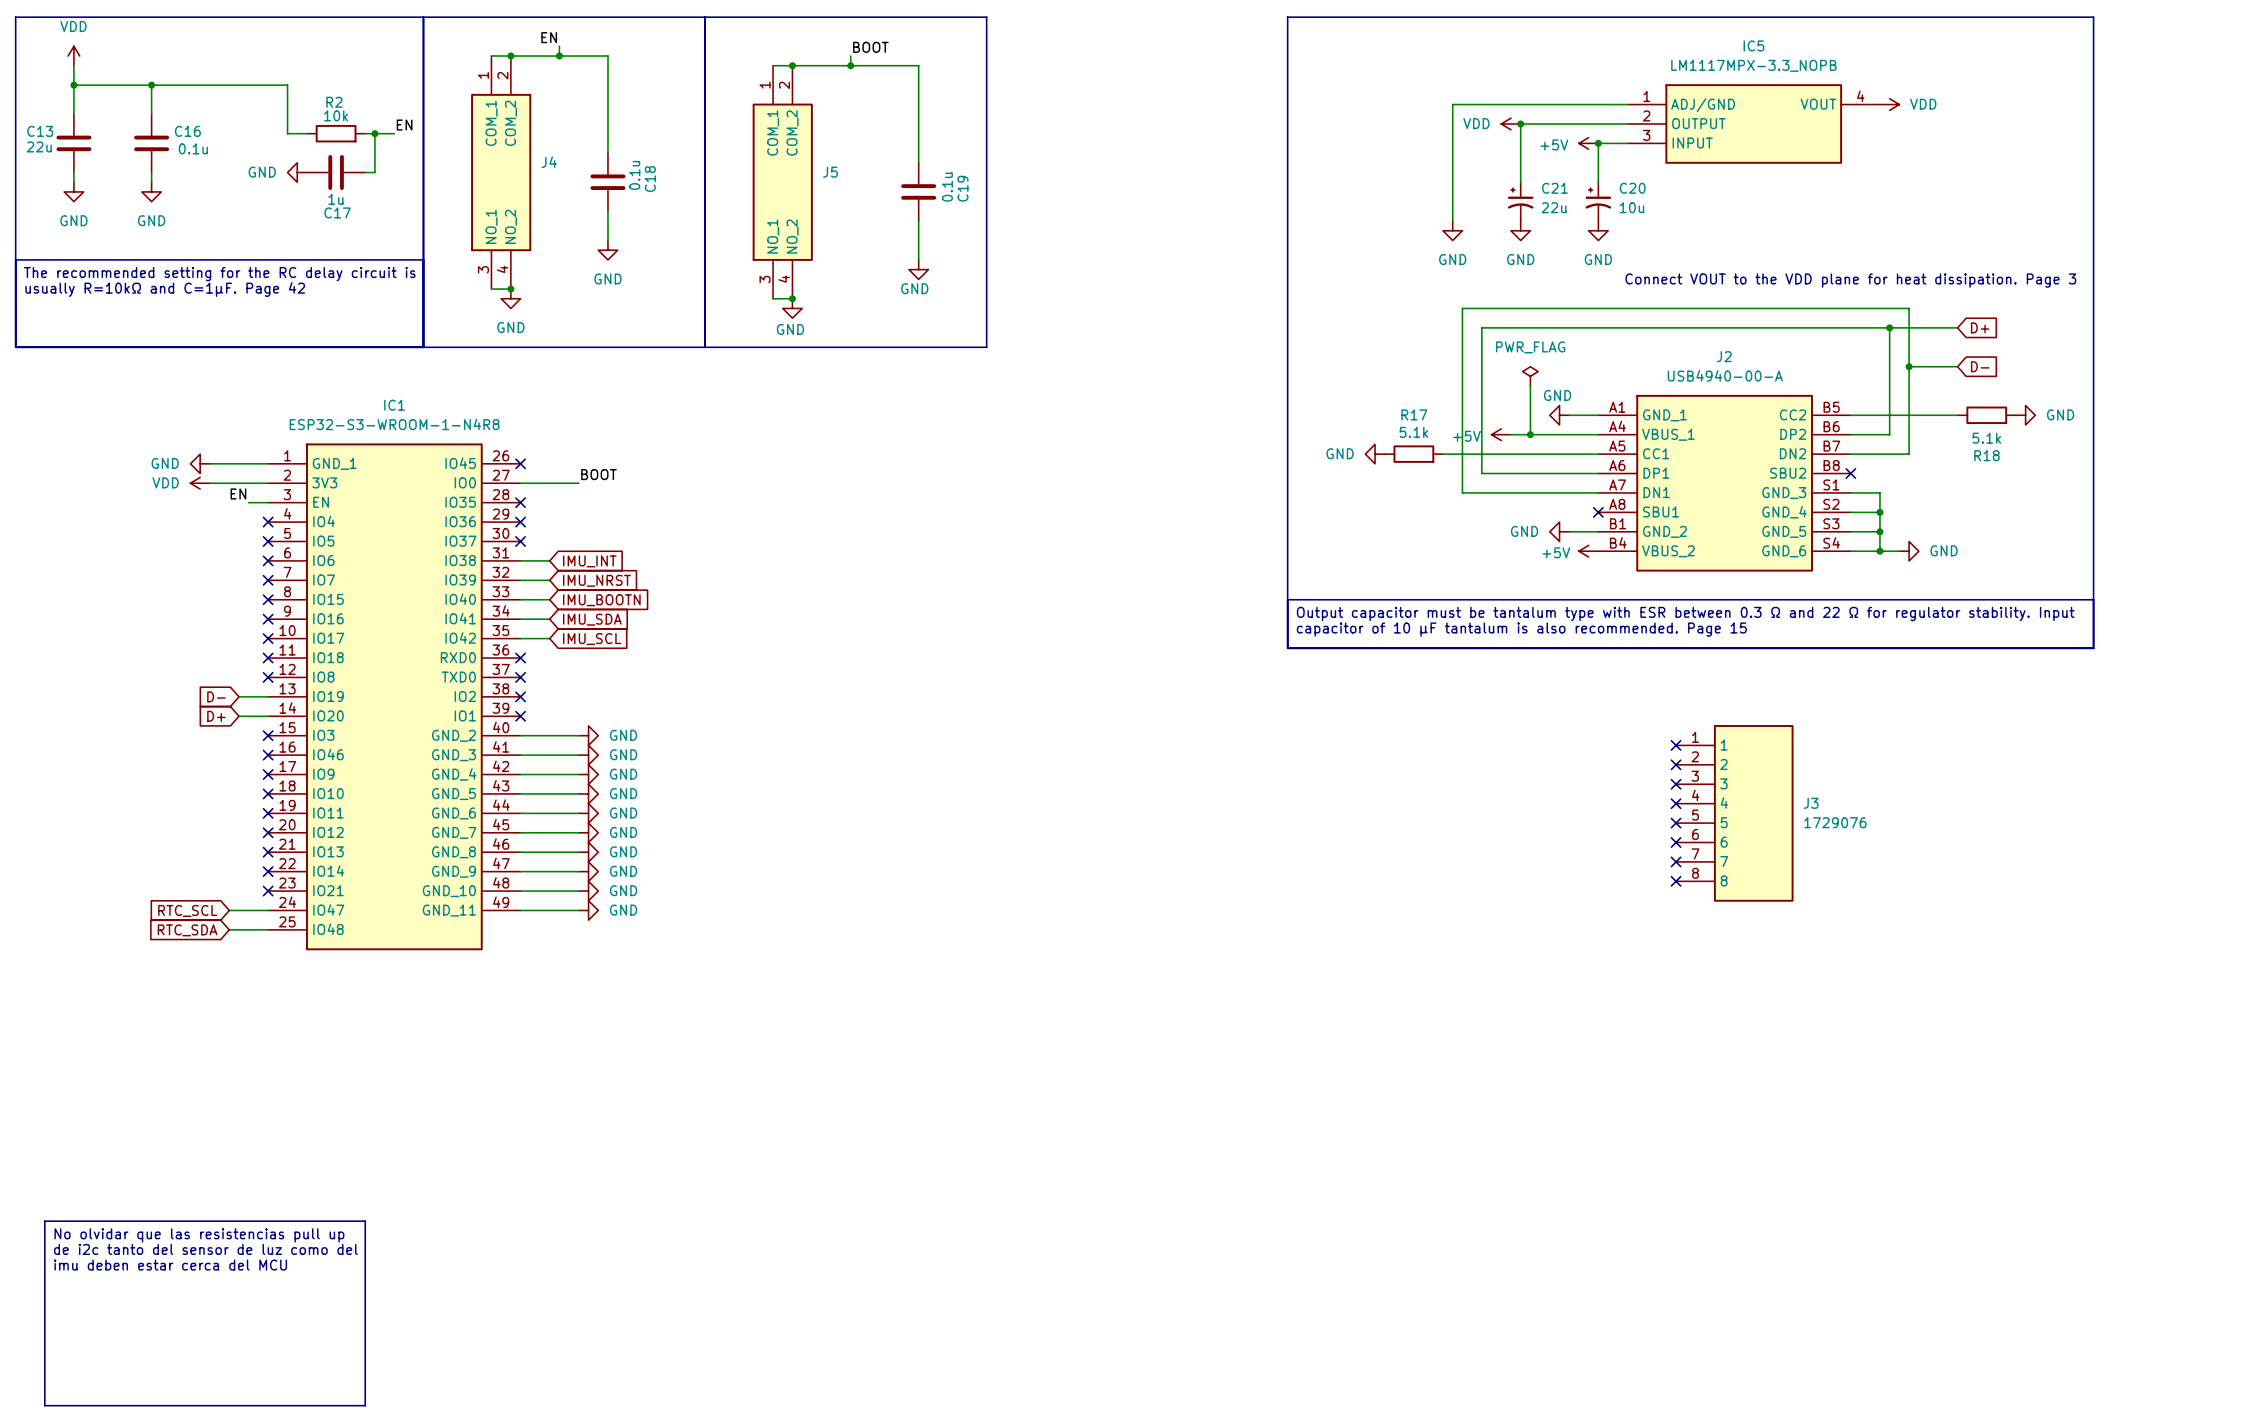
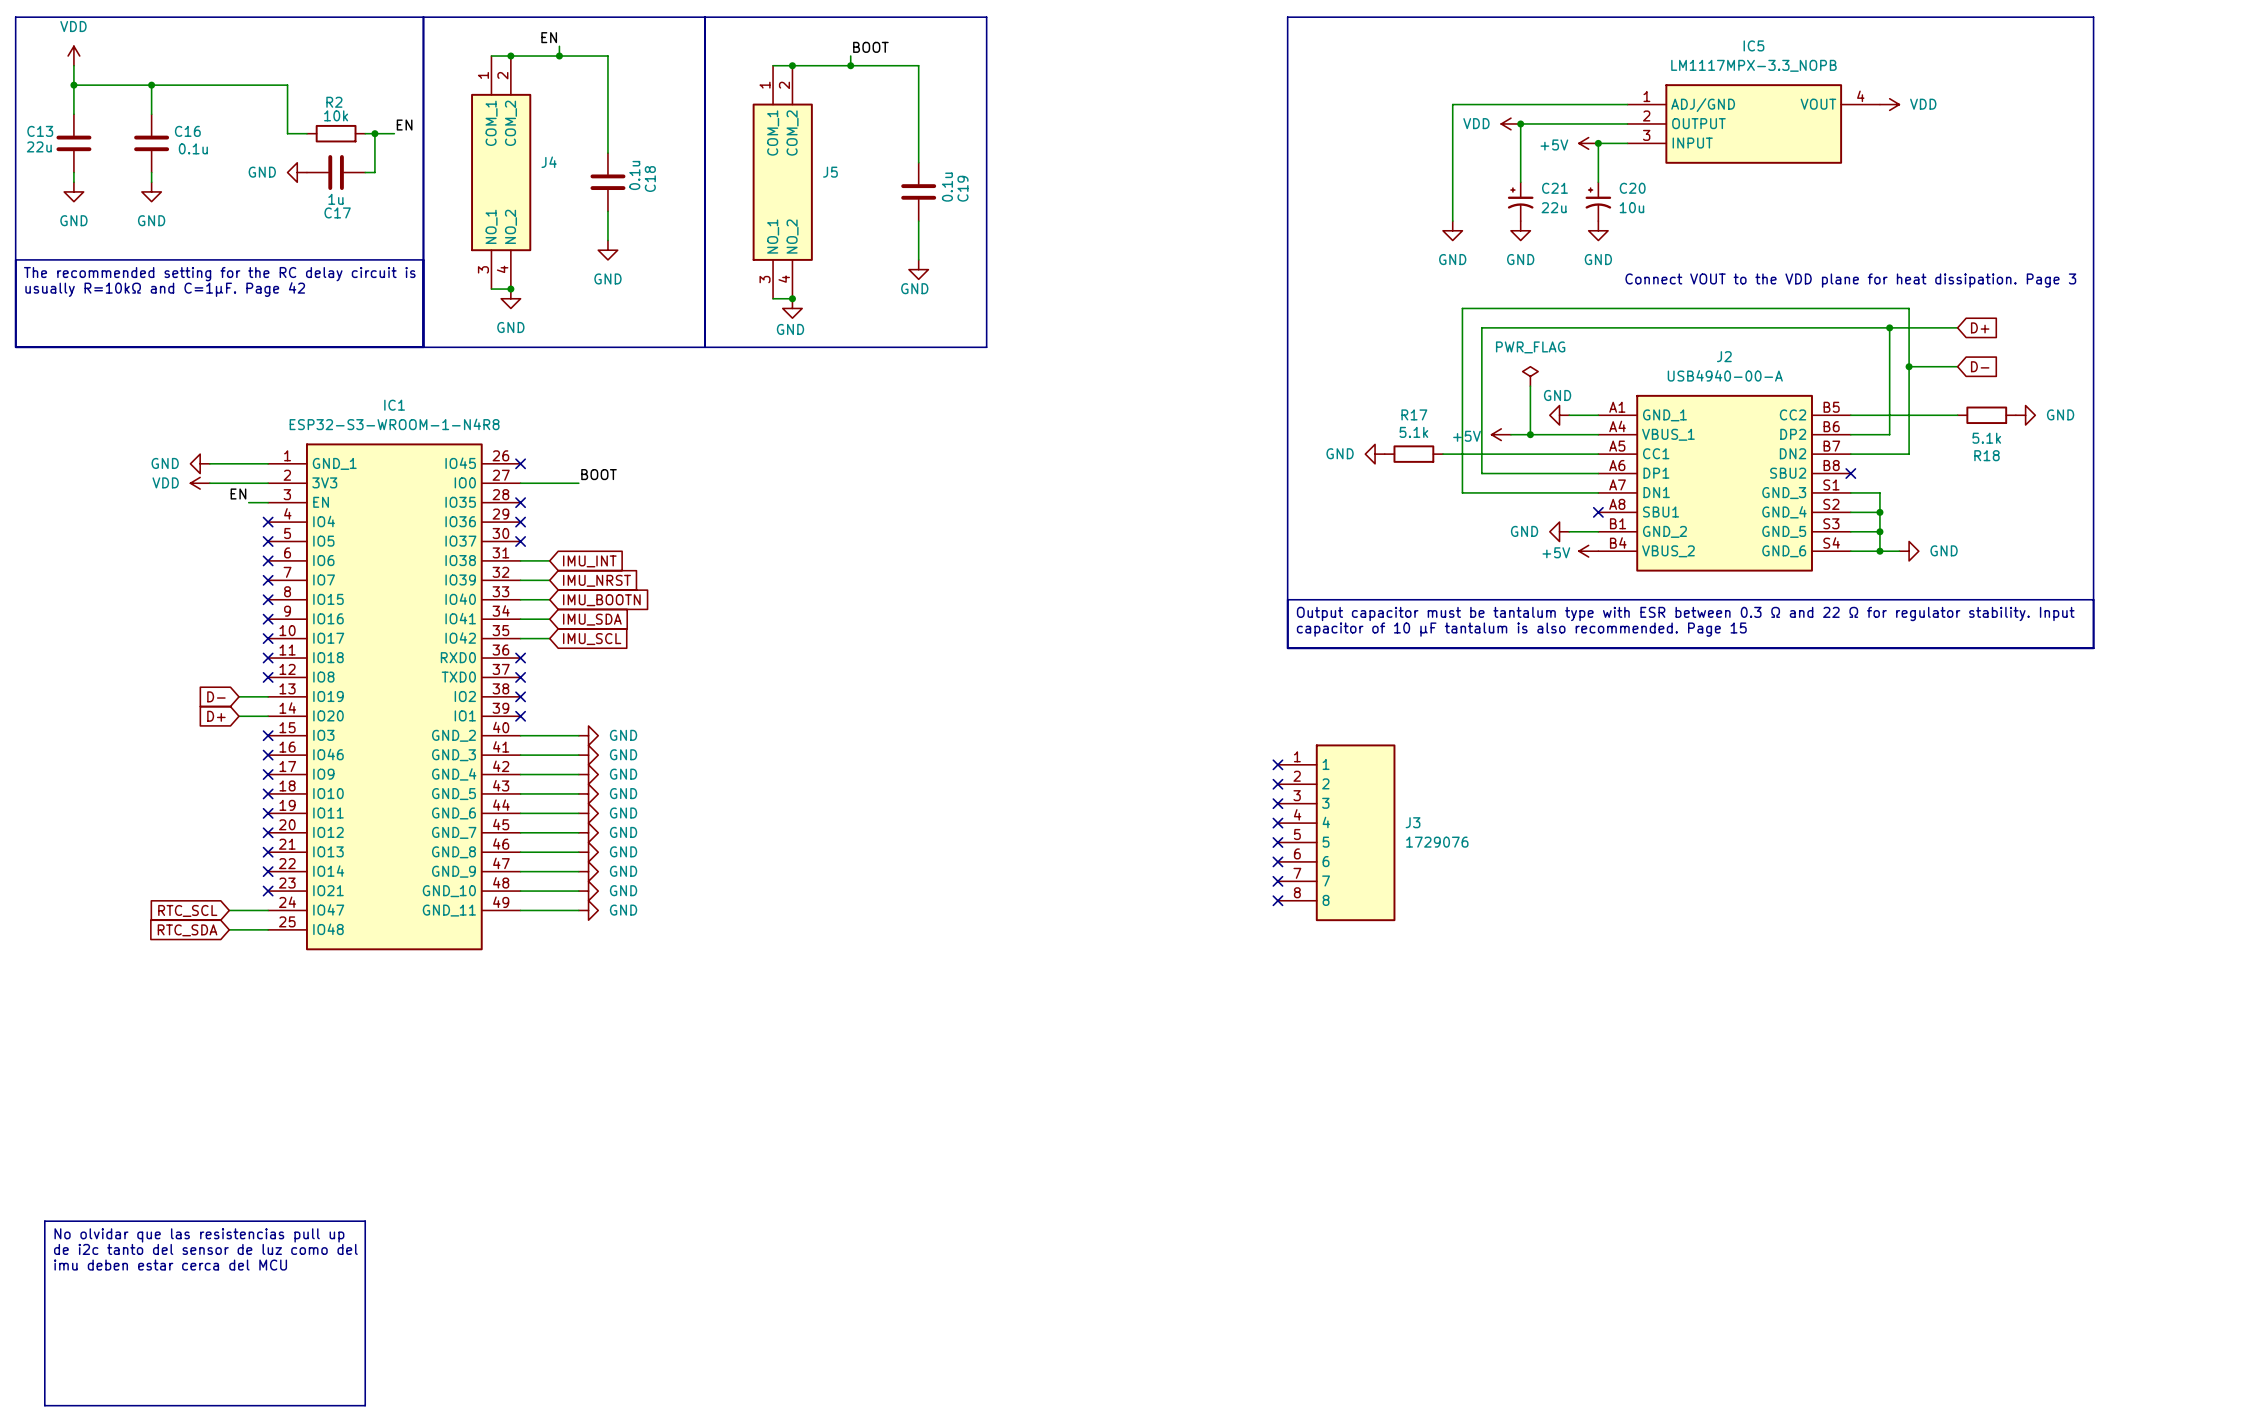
no-connect mark: (1676, 745) -> none
no-connect mark: none -> (1277, 764)
no-connect mark: (1676, 764) -> none
no-connect mark: none -> (1277, 784)
no-connect mark: (1676, 784) -> none
no-connect mark: none -> (1277, 803)
no-connect mark: (1676, 803) -> none
J3 position: (1734, 813) -> (1336, 832)
no-connect mark: none -> (1277, 823)
no-connect mark: (1676, 823) -> none
no-connect mark: none -> (1277, 842)
no-connect mark: (1676, 842) -> none
no-connect mark: none -> (1277, 861)
no-connect mark: (1676, 861) -> none
no-connect mark: none -> (1277, 881)
no-connect mark: (1676, 881) -> none
no-connect mark: none -> (1277, 900)

